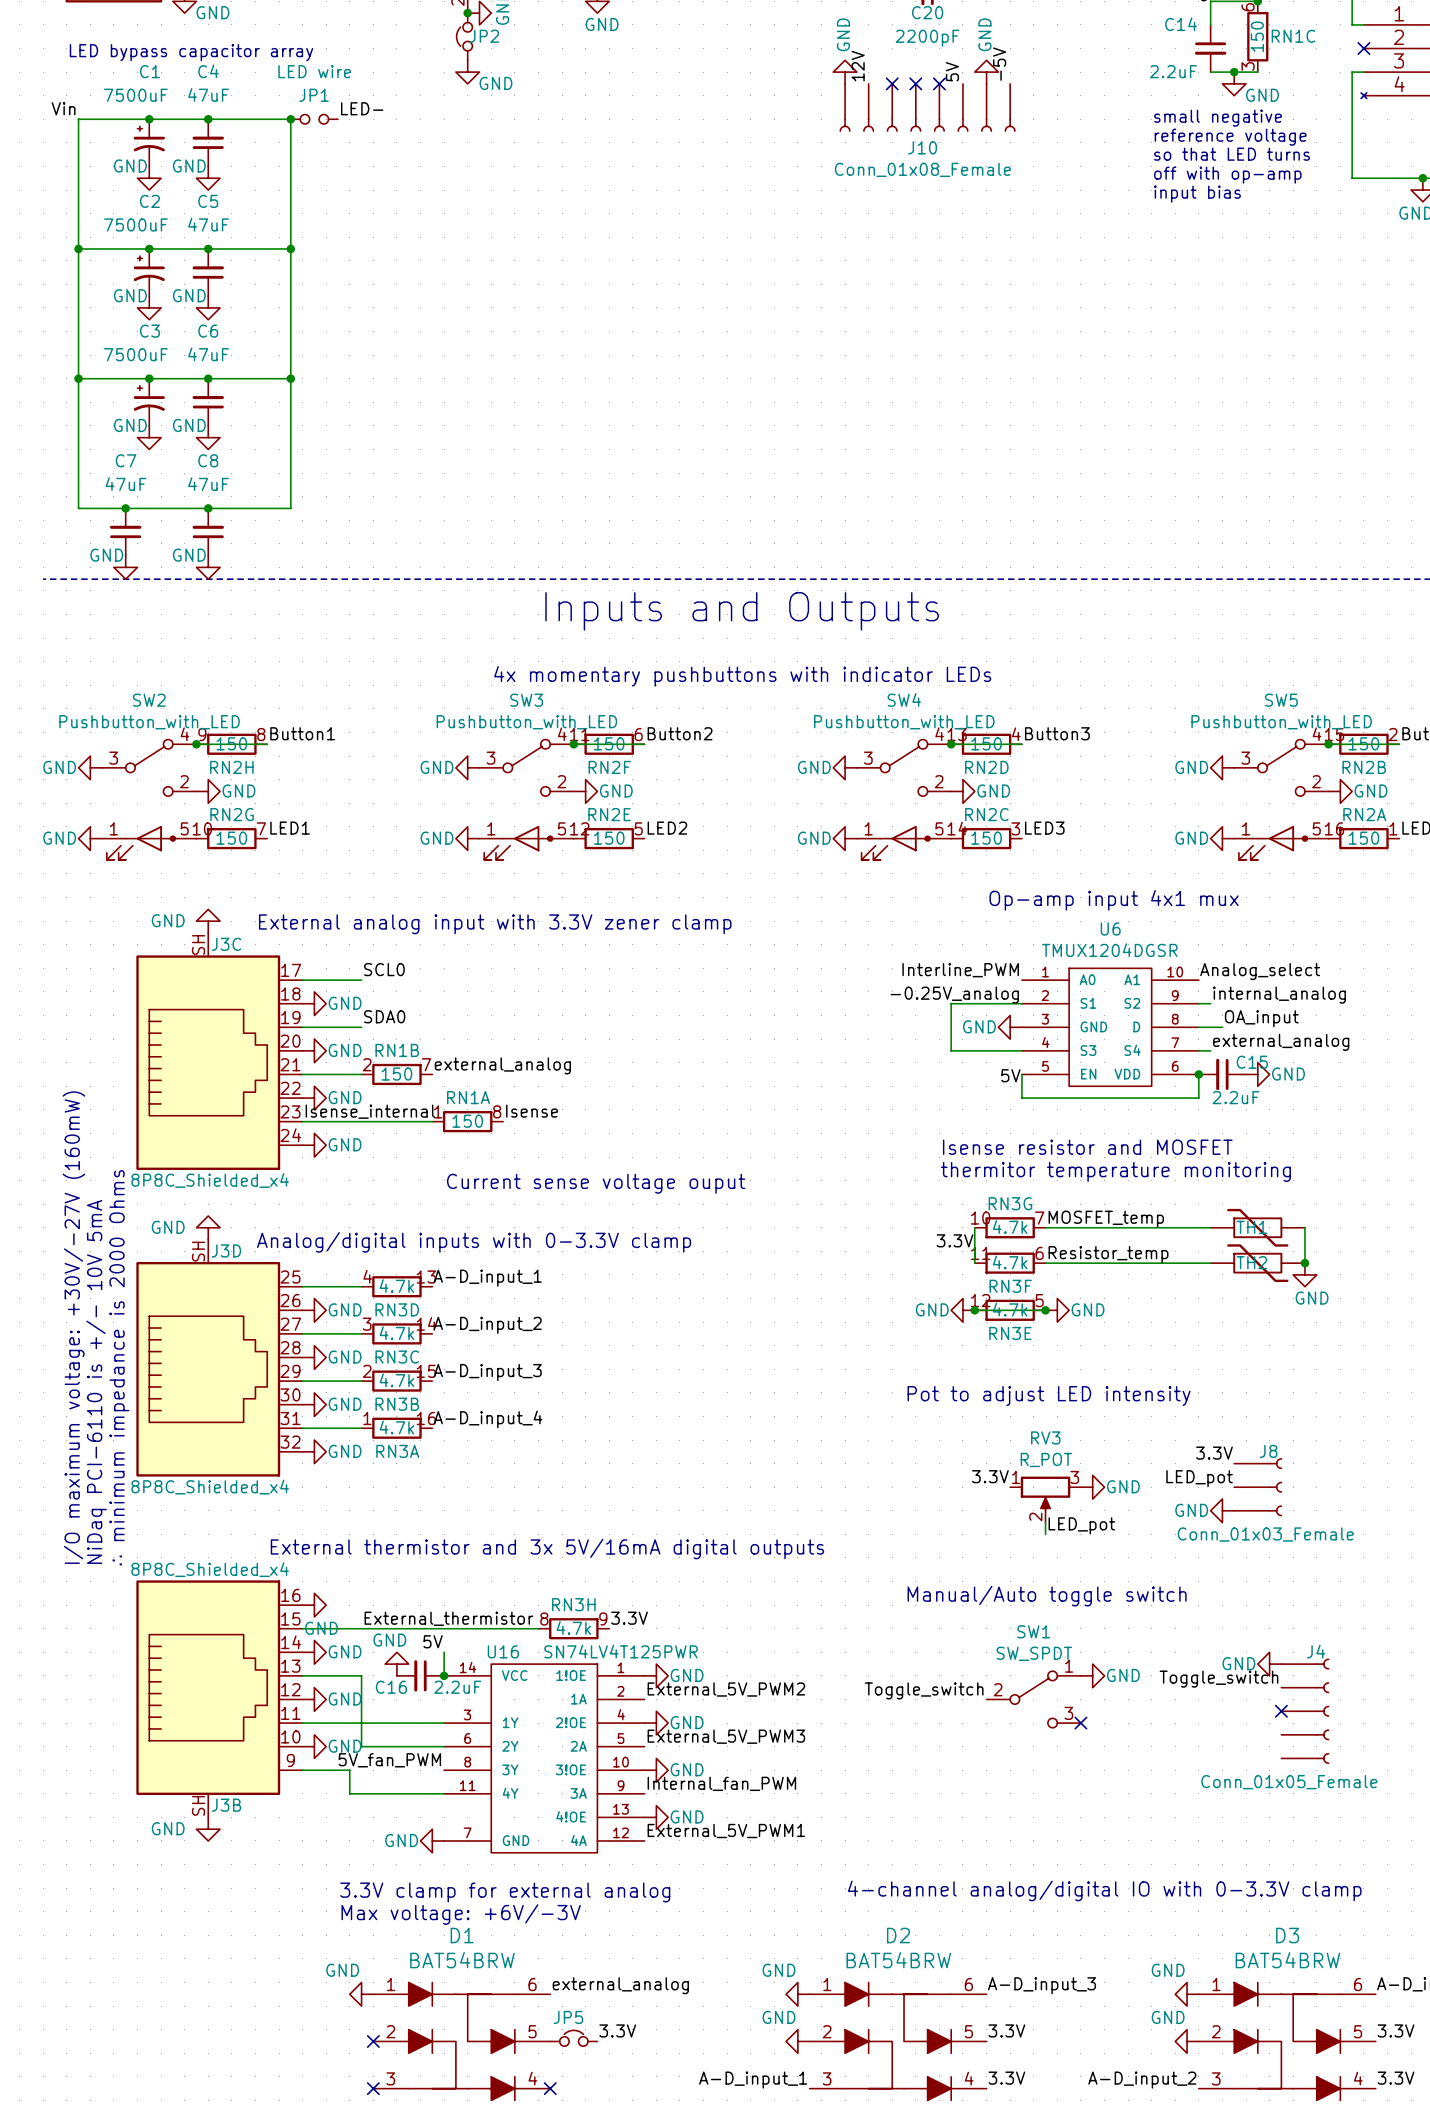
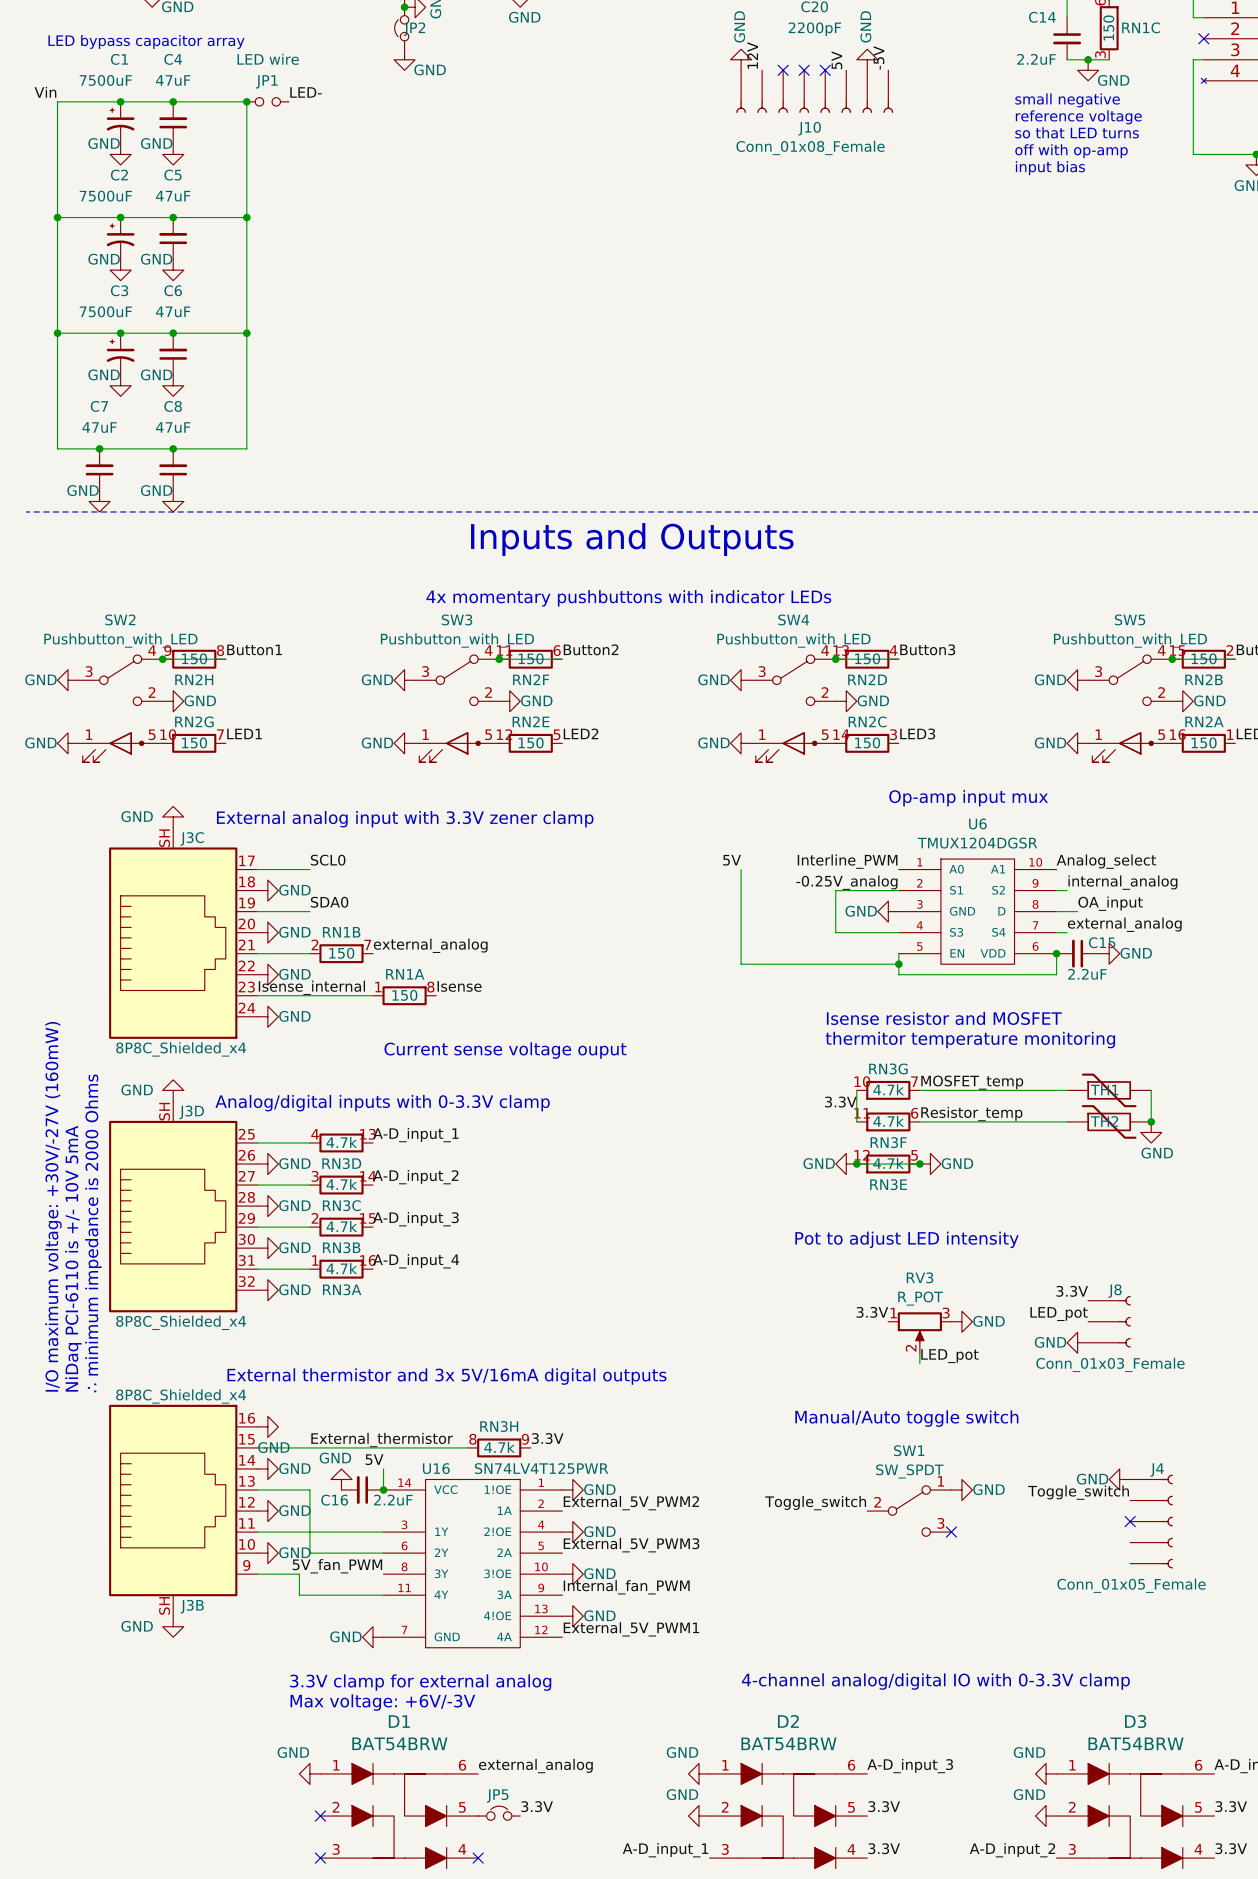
text: Op-amp input 4x1 mux (1114, 900) -> Op-amp input mux (968, 798)
wire: none -> (741, 869) (741, 964) (898, 964)
label position: 5V (1010, 1075) -> 5V (732, 860)
junction: none -> (898, 964)

